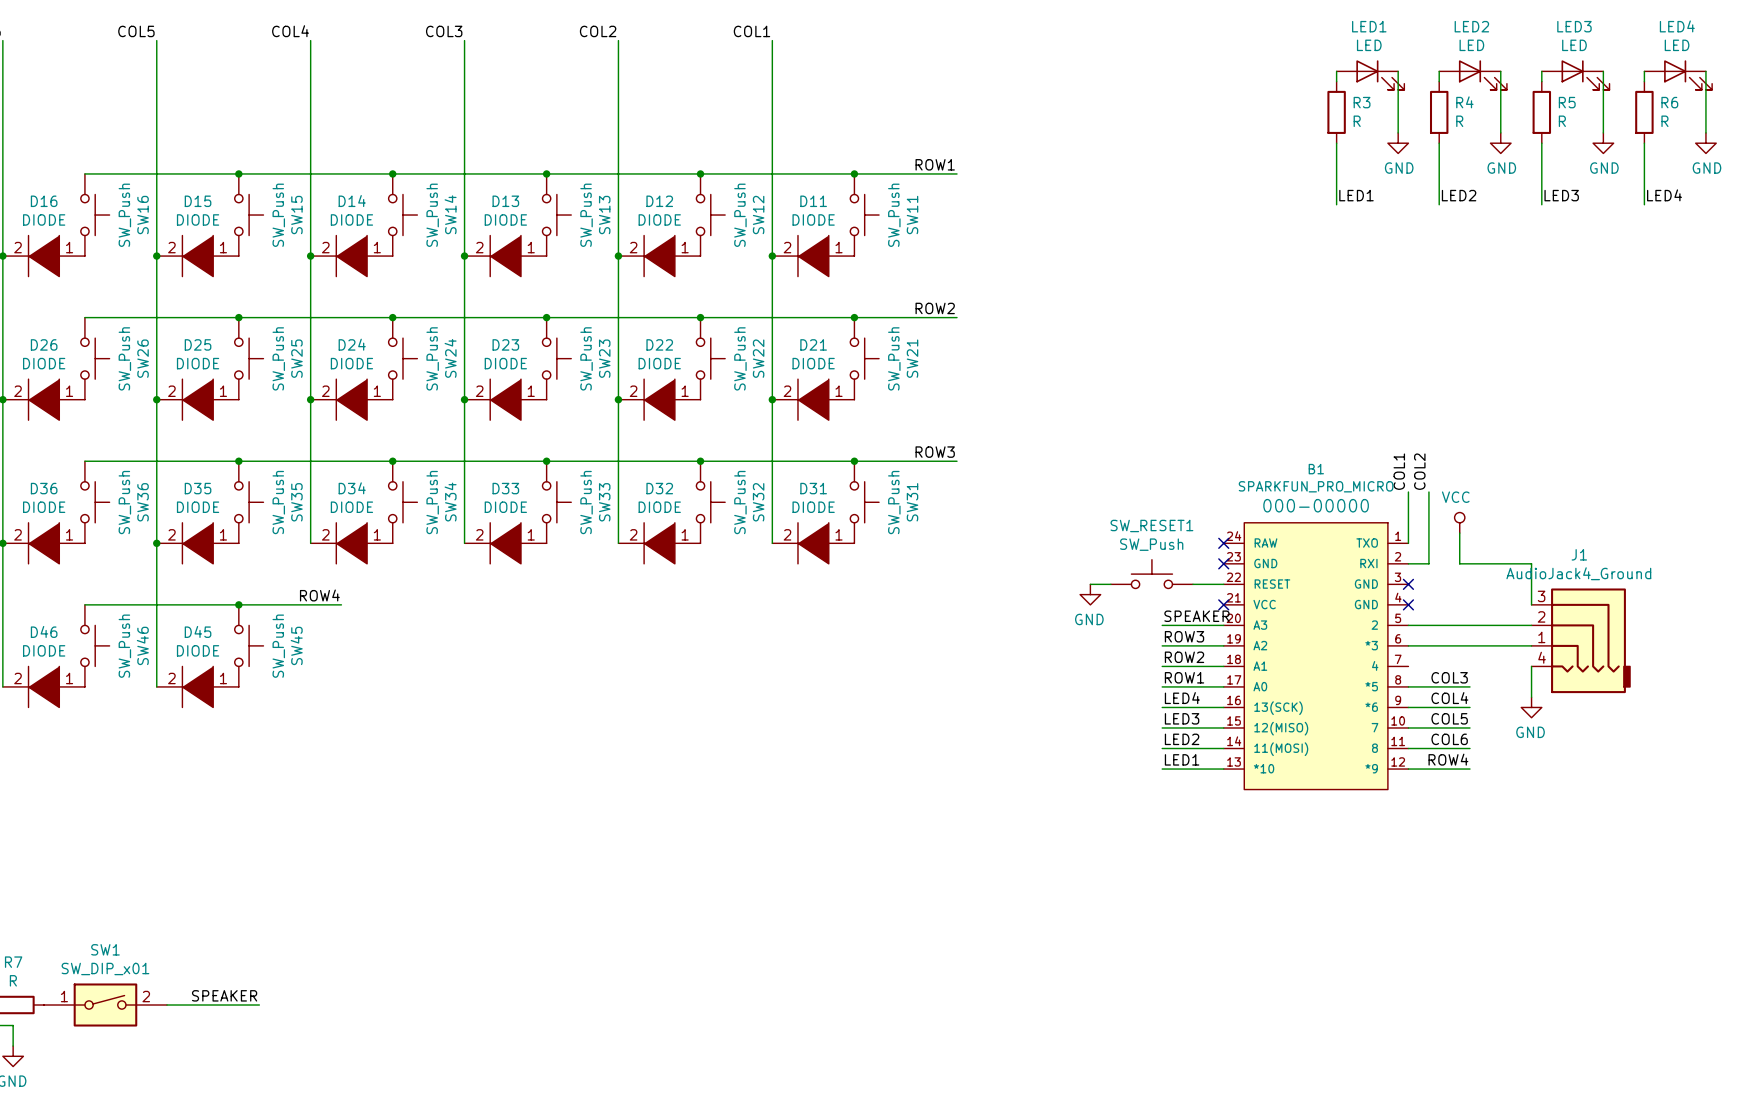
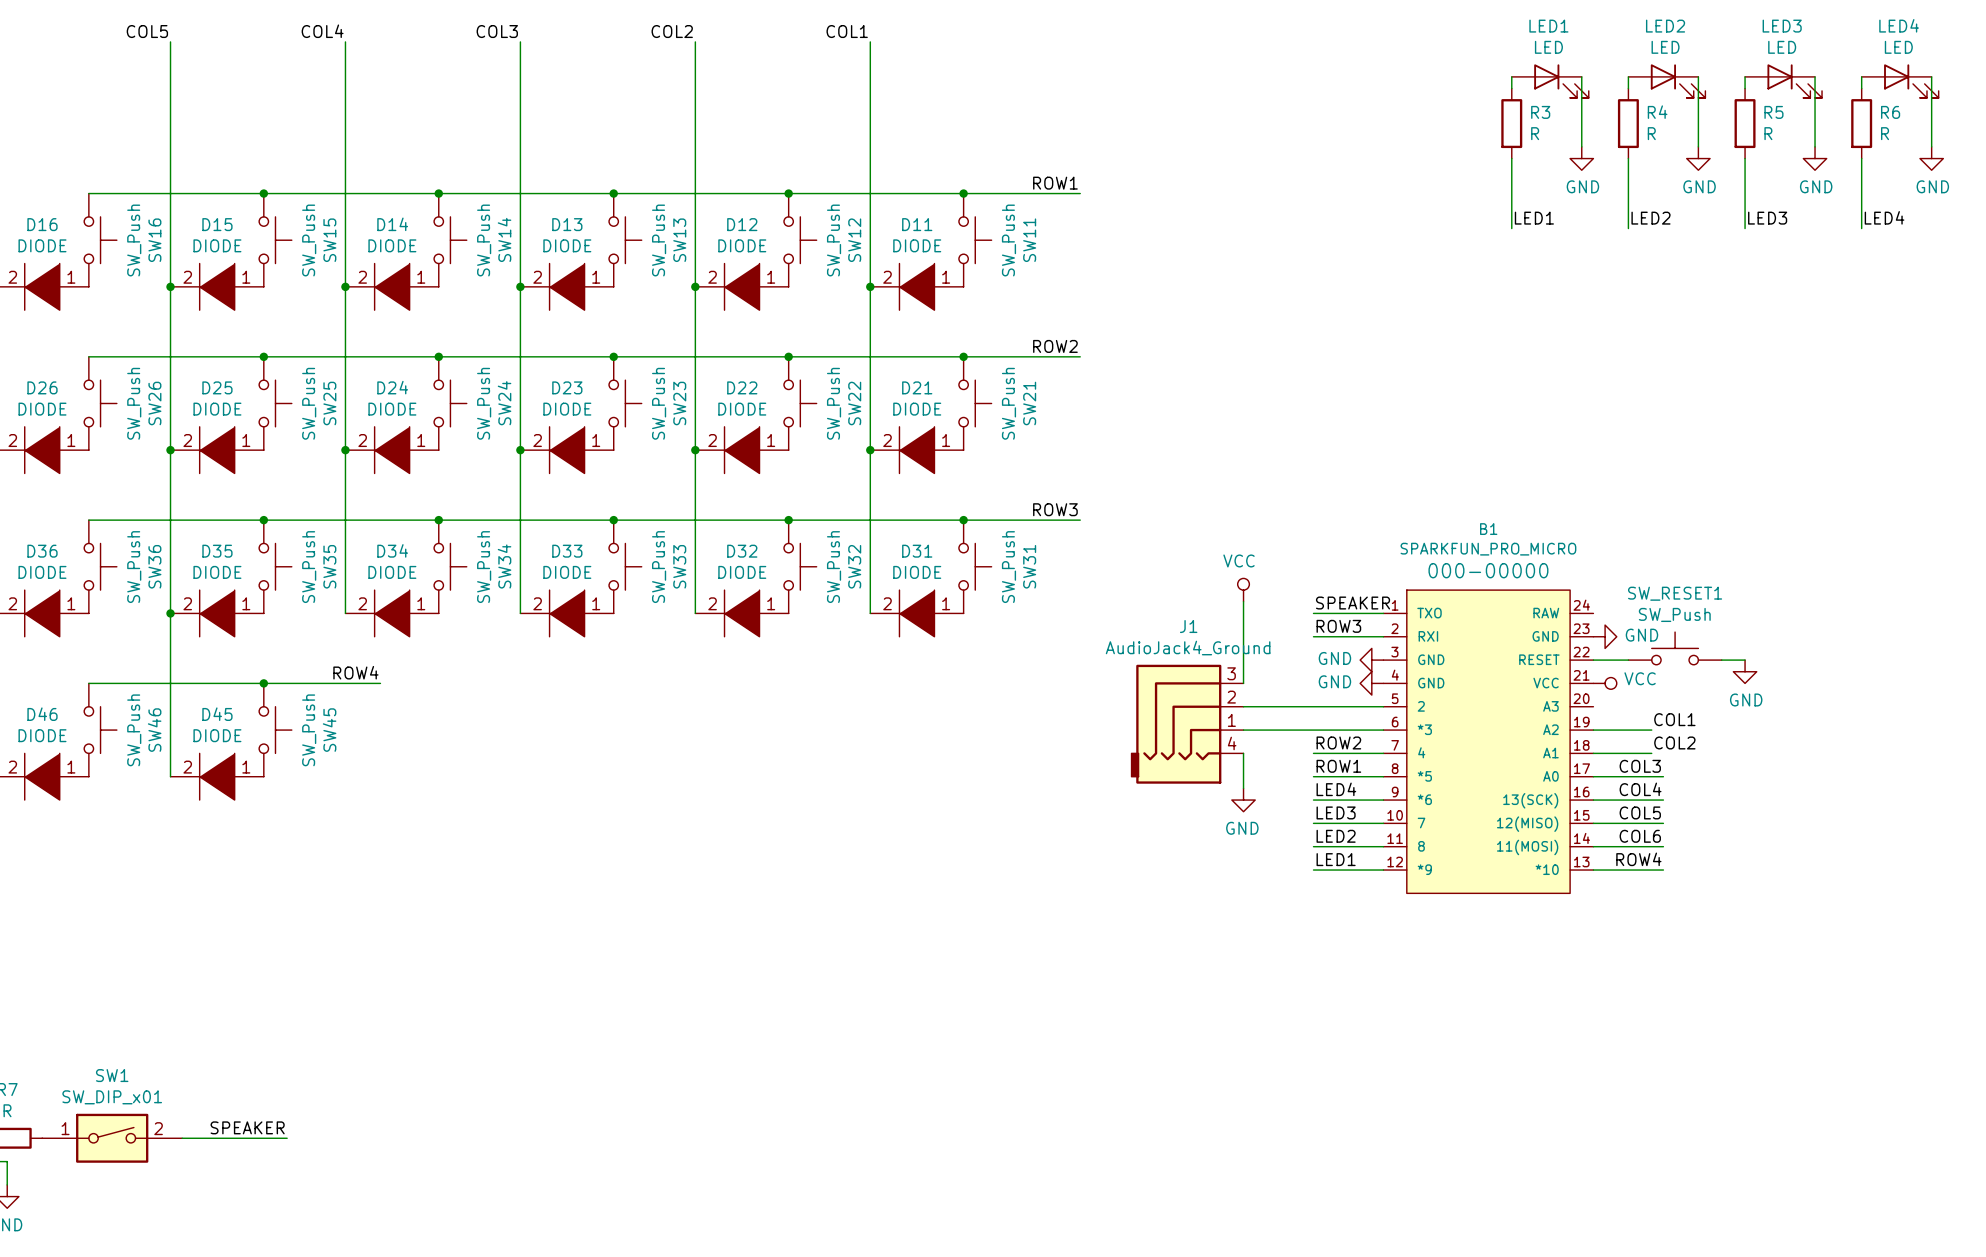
label rotation: 0° (1399, 471) -> 90° clockwise (1674, 719)
label position: COL1 (1399, 471) -> COL1 (1674, 719)
label rotation: 0° (1419, 471) -> 90° clockwise (1674, 742)
label position: COL2 (1419, 471) -> COL2 (1674, 742)
wire: (1408, 492) (1408, 543) -> none
wire: (1428, 492) (1428, 563) (1408, 563) -> none
power symbol: none -> VCC (1243, 590)
power symbol rotation: 0° (1459, 522) -> 90° clockwise (1605, 683)
power symbol position: VCC (1459, 522) -> VCC (1605, 683)
wire: none -> (1243, 601) (1243, 683)
wire: (1459, 533) (1459, 563) (1531, 563) (1531, 604) -> none
wire: none -> (1313, 613) (1383, 613)
no-connect mark: (1223, 543) -> none
wire: none -> (1313, 636) (1383, 636)
no-connect mark: (1223, 563) -> none
power symbol: none -> GND (1605, 636)
SW_RESET1 position: (1151, 574) -> (1675, 648)
wire: (1090, 584) (1110, 584) -> none
wire: (1192, 584) (1223, 584) -> none
power symbol: none -> GND (1371, 660)
wire: none -> (1593, 660) (1628, 660)
no-connect mark: (1408, 584) -> none
wire: none -> (1721, 660) (1745, 660)
power symbol: GND (1090, 594) -> none
power symbol: none -> GND (1745, 671)
power symbol: none -> GND (1371, 683)
no-connect mark: (1223, 604) -> none
no-connect mark: (1408, 604) -> none
label position: SPEAKER (1196, 616) -> SPEAKER (1353, 603)
wire: none -> (1243, 706) (1313, 706)
wire: (1408, 625) (1531, 625) -> none
label position: ROW3 (1184, 636) -> ROW3 (1338, 626)
J1 position: (1580, 640) -> (1187, 724)
J1 flip: as is (1590, 640) -> left-right (1176, 724)
wire: none -> (1243, 730) (1313, 730)
wire: (1459, 645) (1531, 645) -> none
B1 flip: as is (1316, 656) -> left-right (1488, 741)
wire: none -> (1243, 753) (1243, 788)
wire: none -> (1593, 753) (1651, 753)
wire: (1531, 666) (1531, 697) -> none
power symbol: none -> GND (1243, 800)
power symbol: GND (1531, 707) -> none

